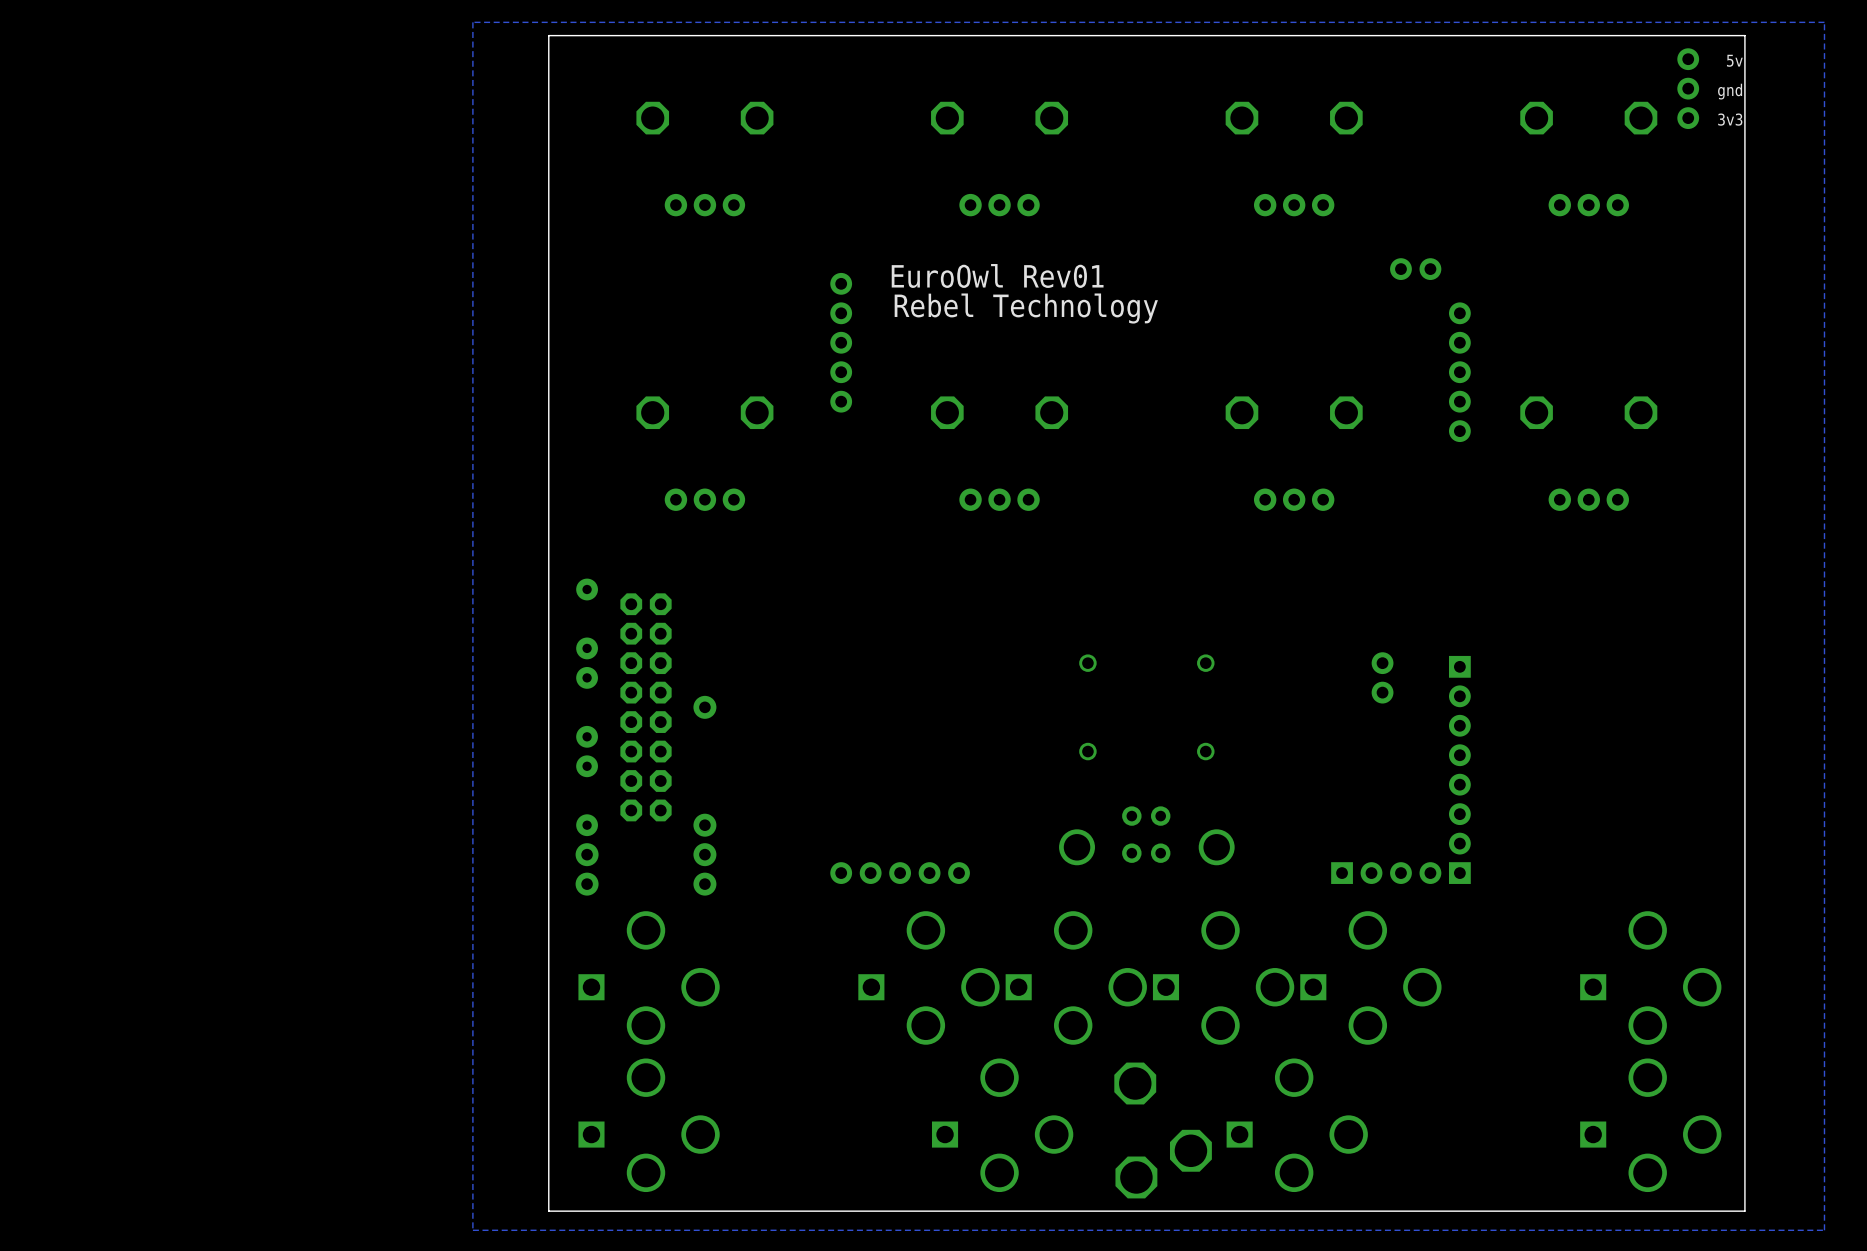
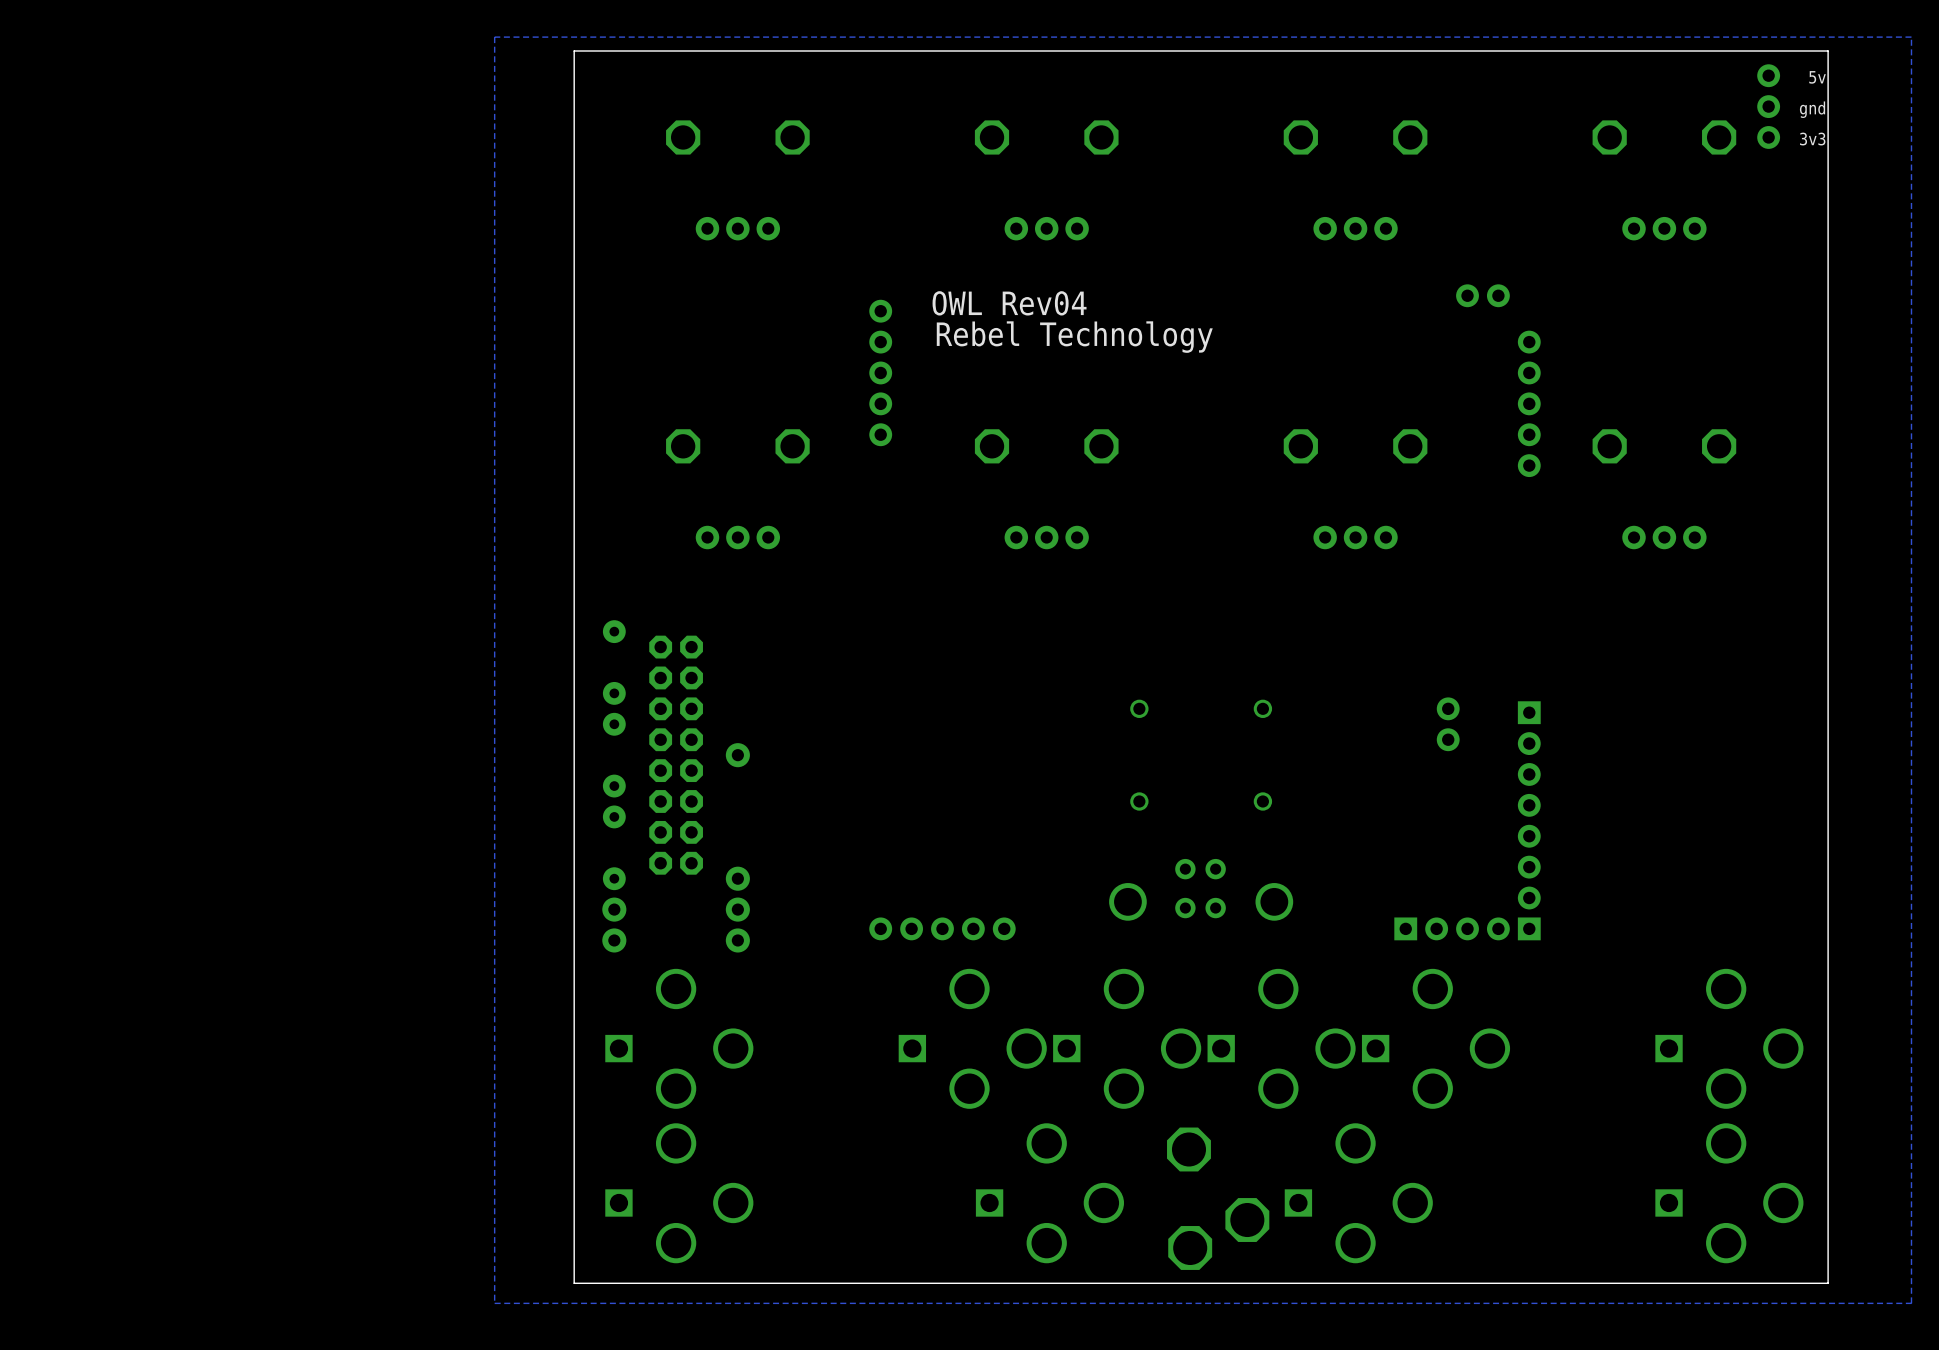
text: EuroOwl Rev01 (997, 275) -> OWL Rev04 (1009, 303)

